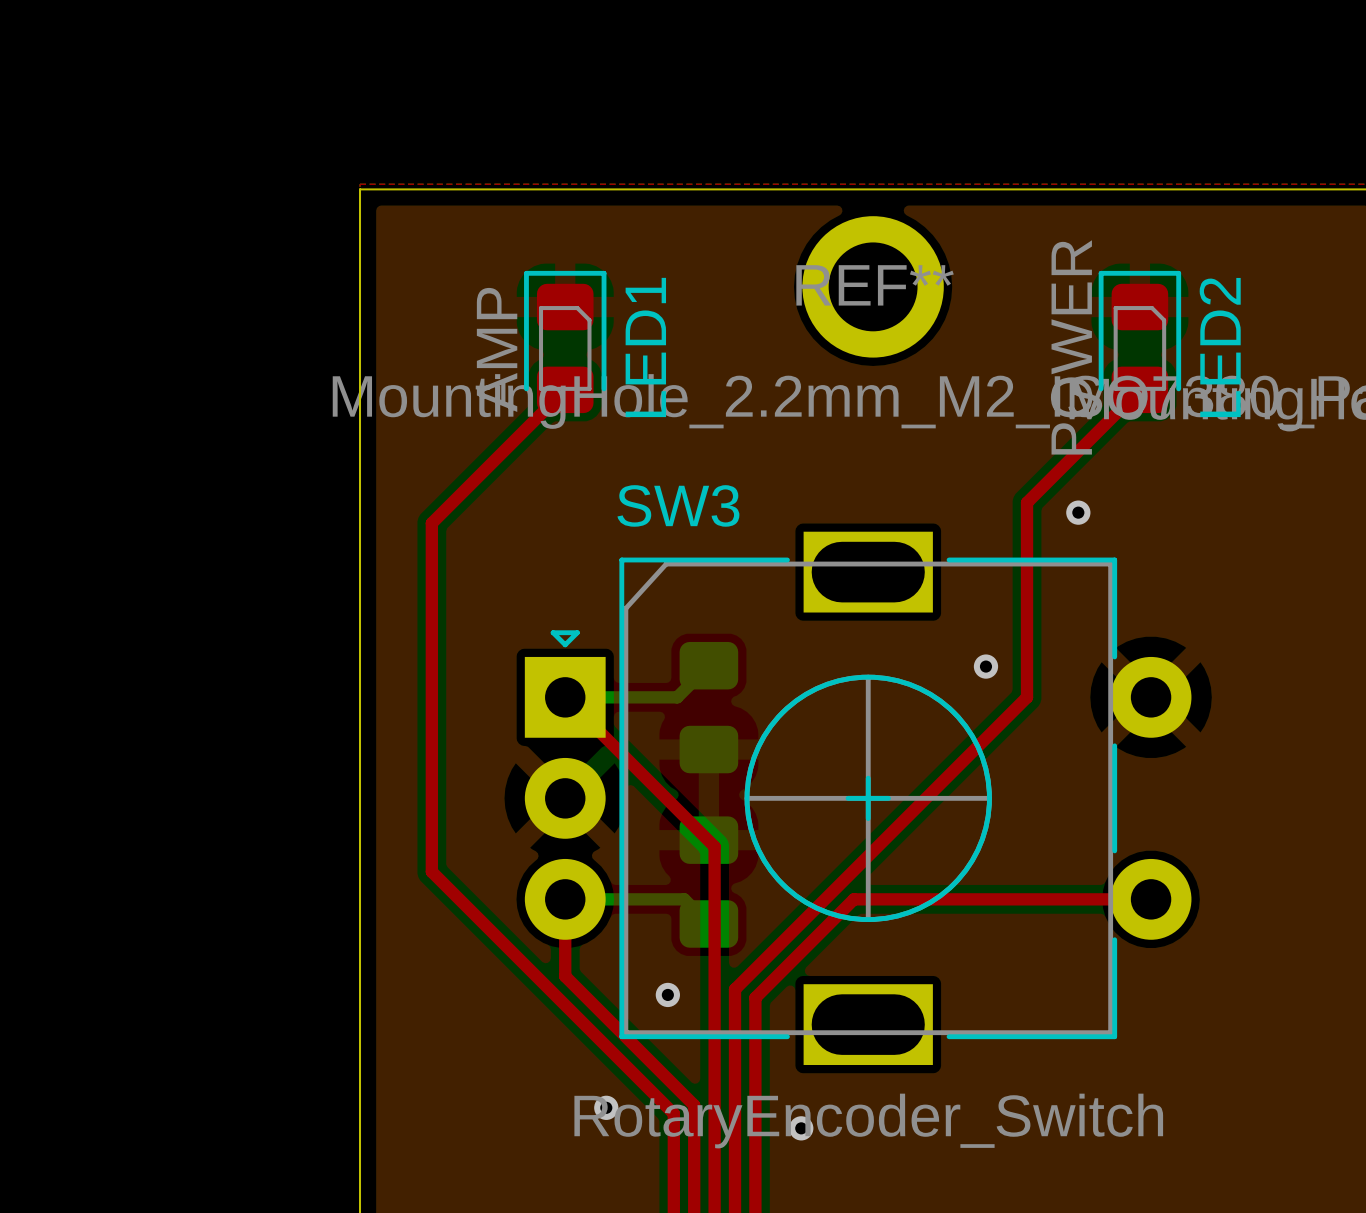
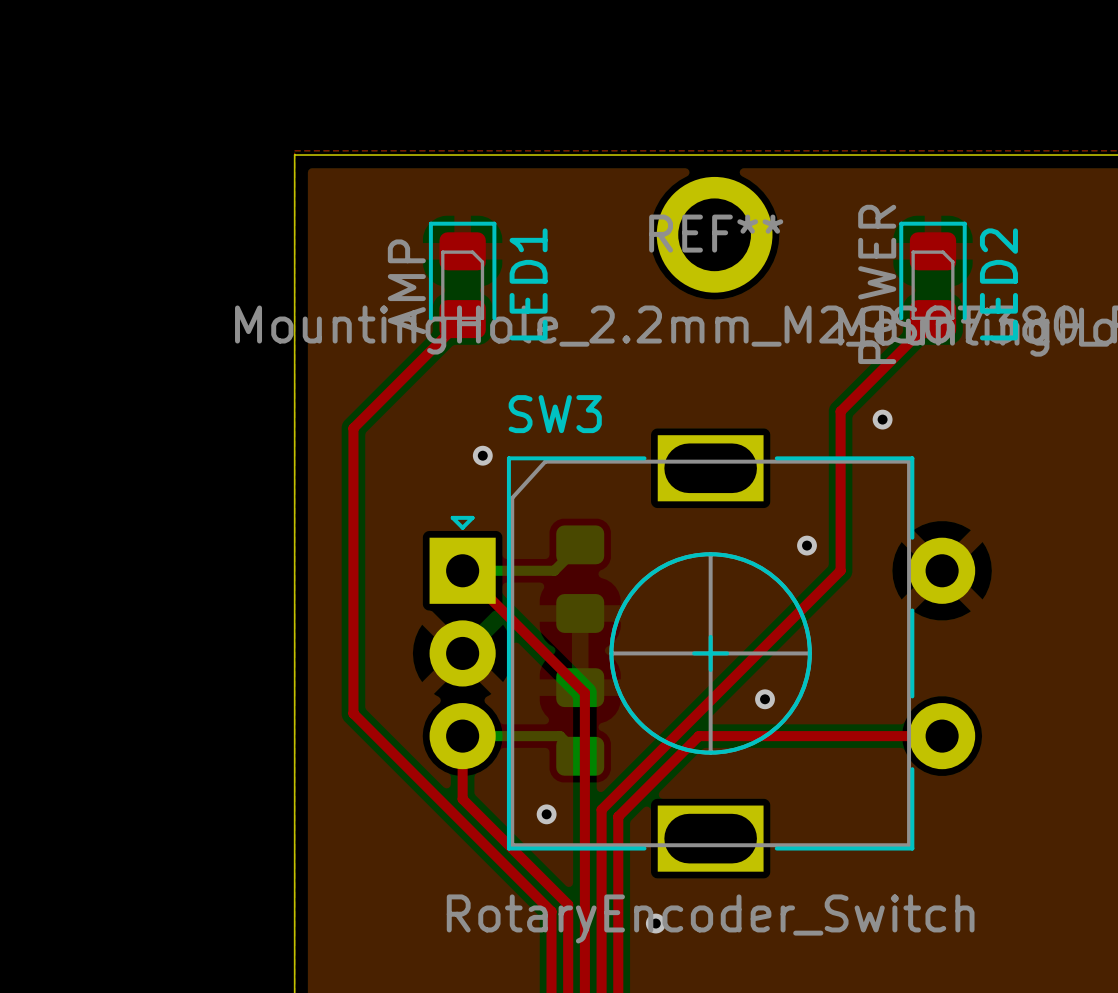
via: none -> (482, 455)
via: none -> (765, 699)
via: (606, 1107) -> none

